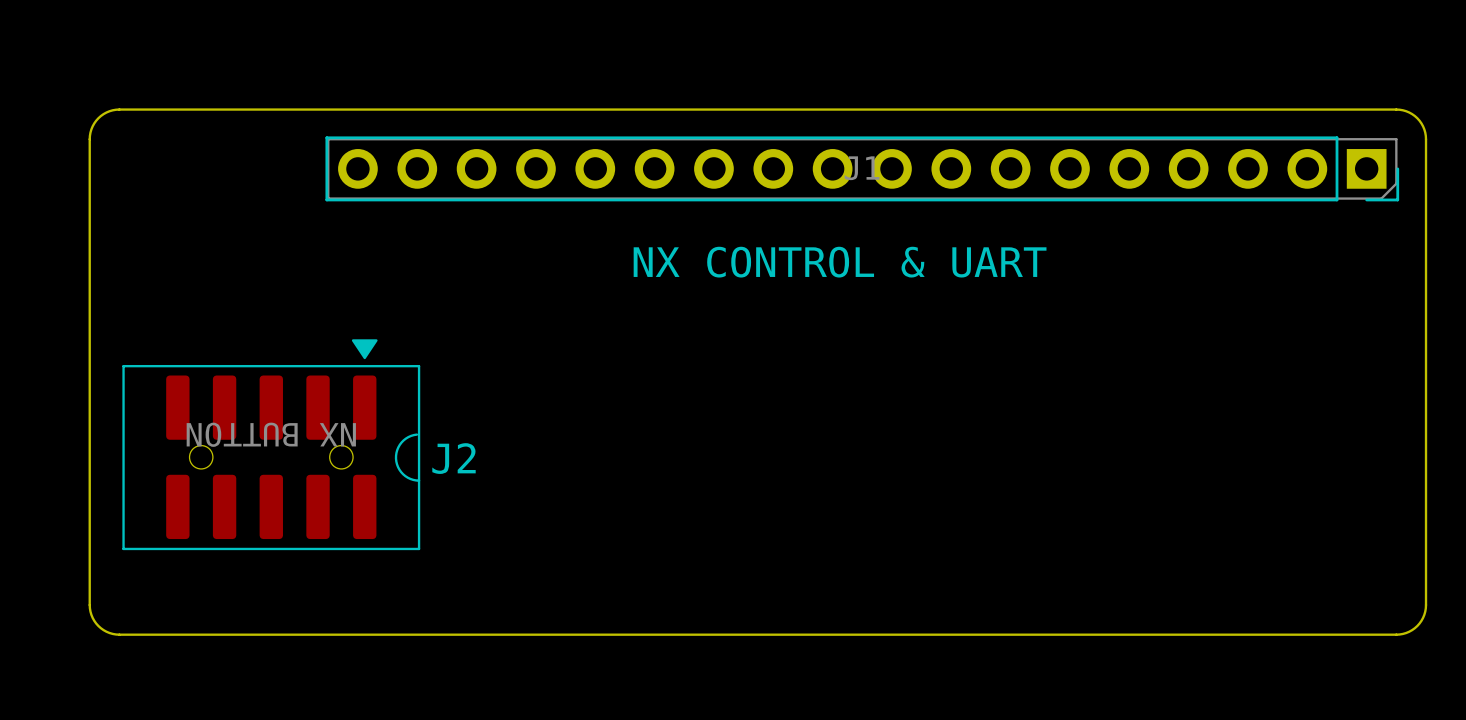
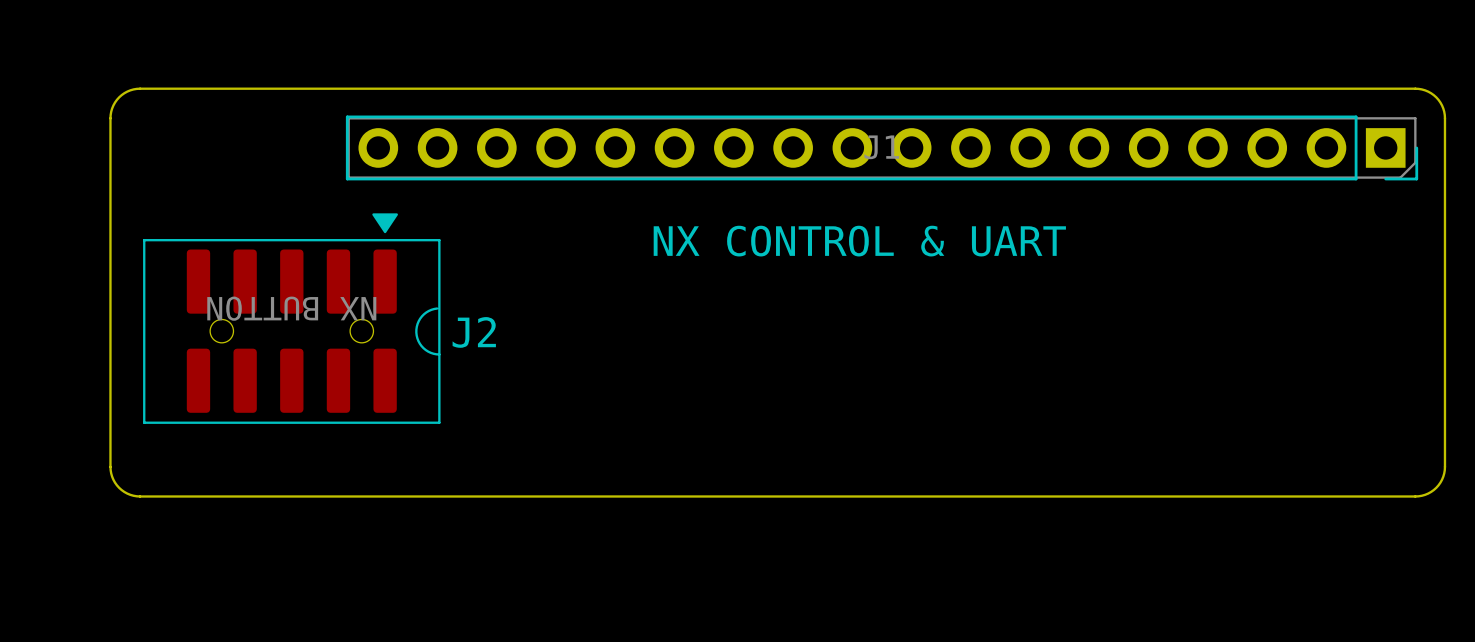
J2 position: (271, 444) -> (291, 318)
board edge: (89, 488) (90, 611) (94, 620) (100, 628) (109, 633) (119, 634) (1399, 634) (1414, 628) (1421, 620) (1425, 611) (1426, 488) -> (110, 466) (112, 476) (119, 487) (127, 493) (140, 496) (1415, 496) (1425, 494) (1436, 487) (1443, 476) (1444, 466)

